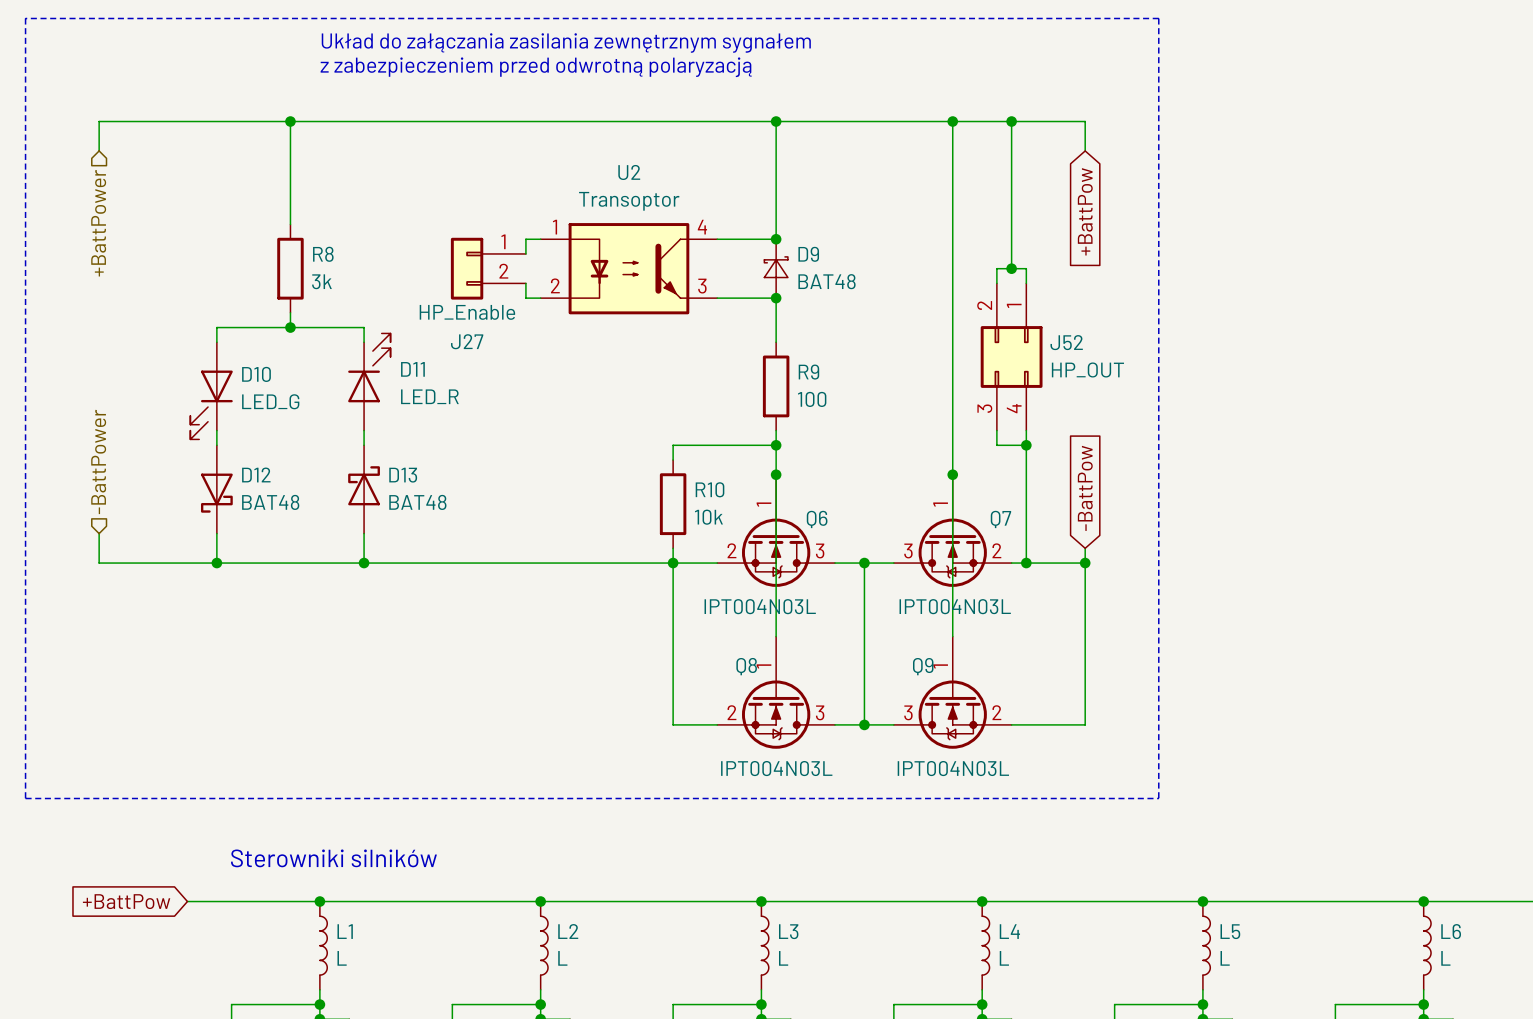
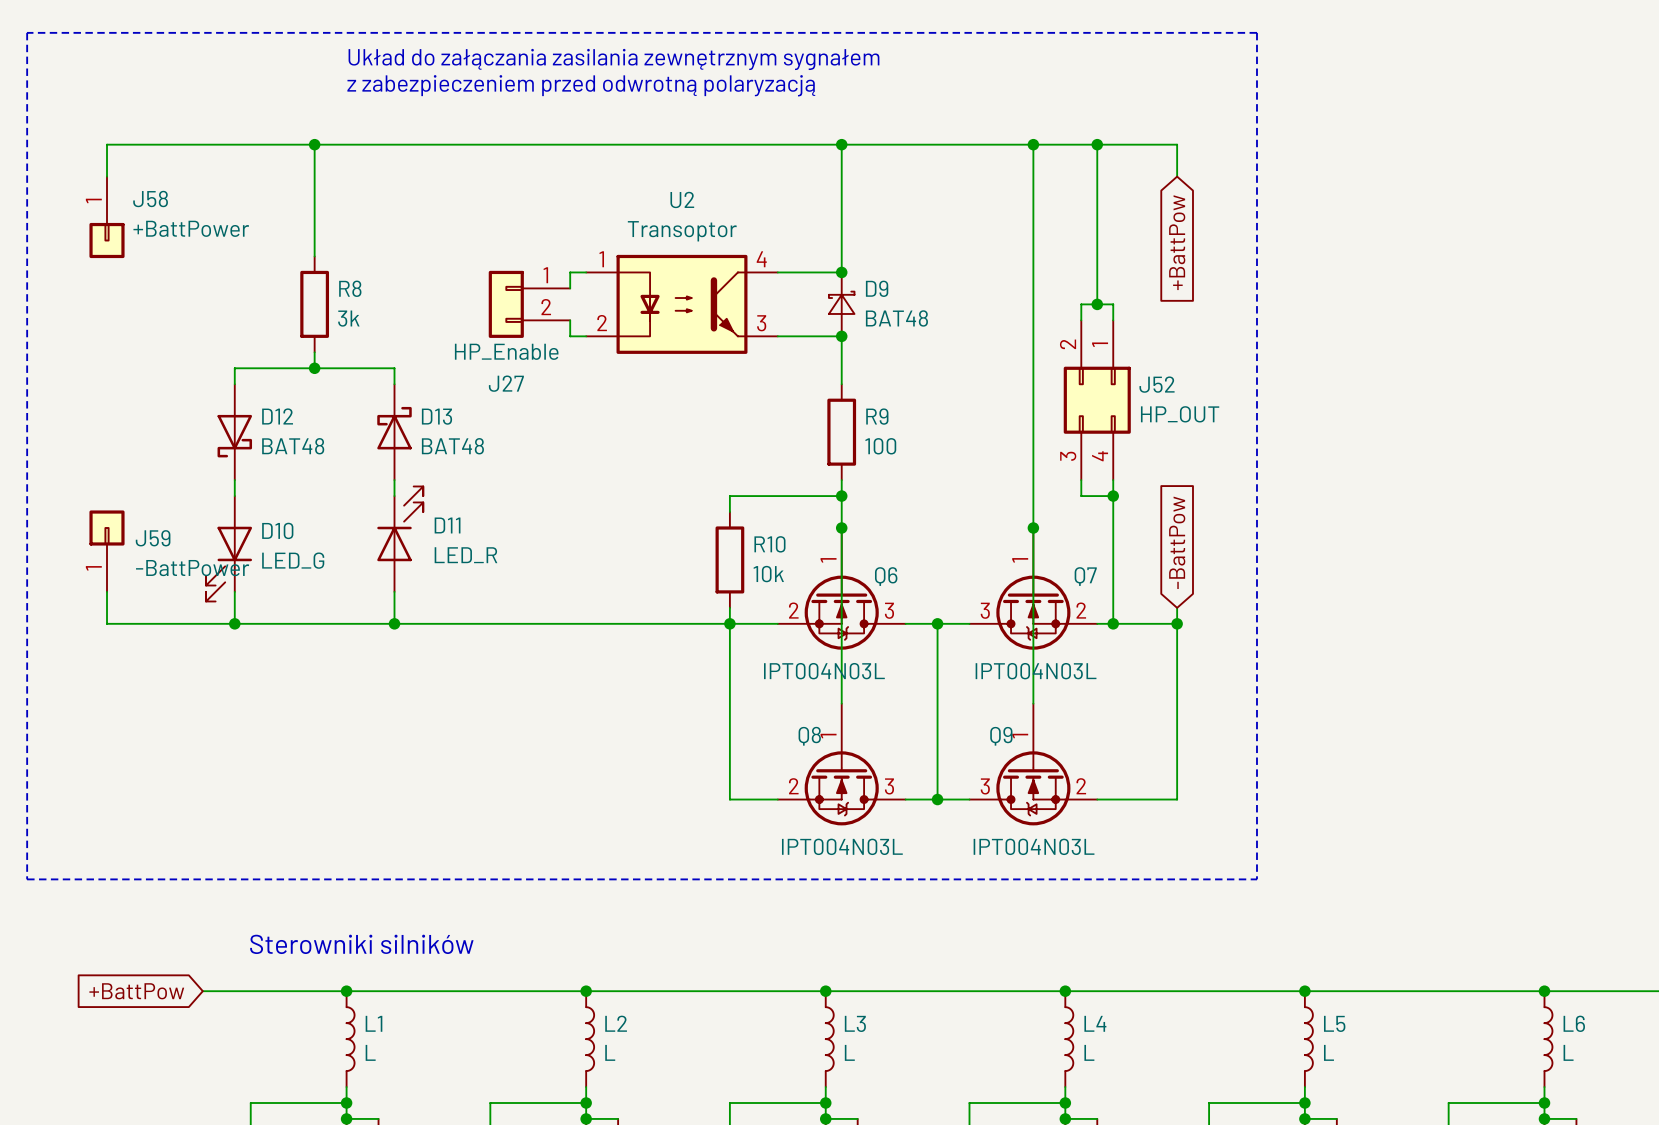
J58: none -> +BattPower (107, 217)
hierarchical label: +BattPower (98, 223) -> none
D11 position: (369, 382) -> (400, 539)
D10 position: (211, 390) -> (229, 548)
hierarchical label: -BattPower (98, 461) -> none
D12 position: (216, 489) -> (234, 432)
D13 position: (364, 489) -> (394, 432)
J59: none -> -BattPower (107, 551)

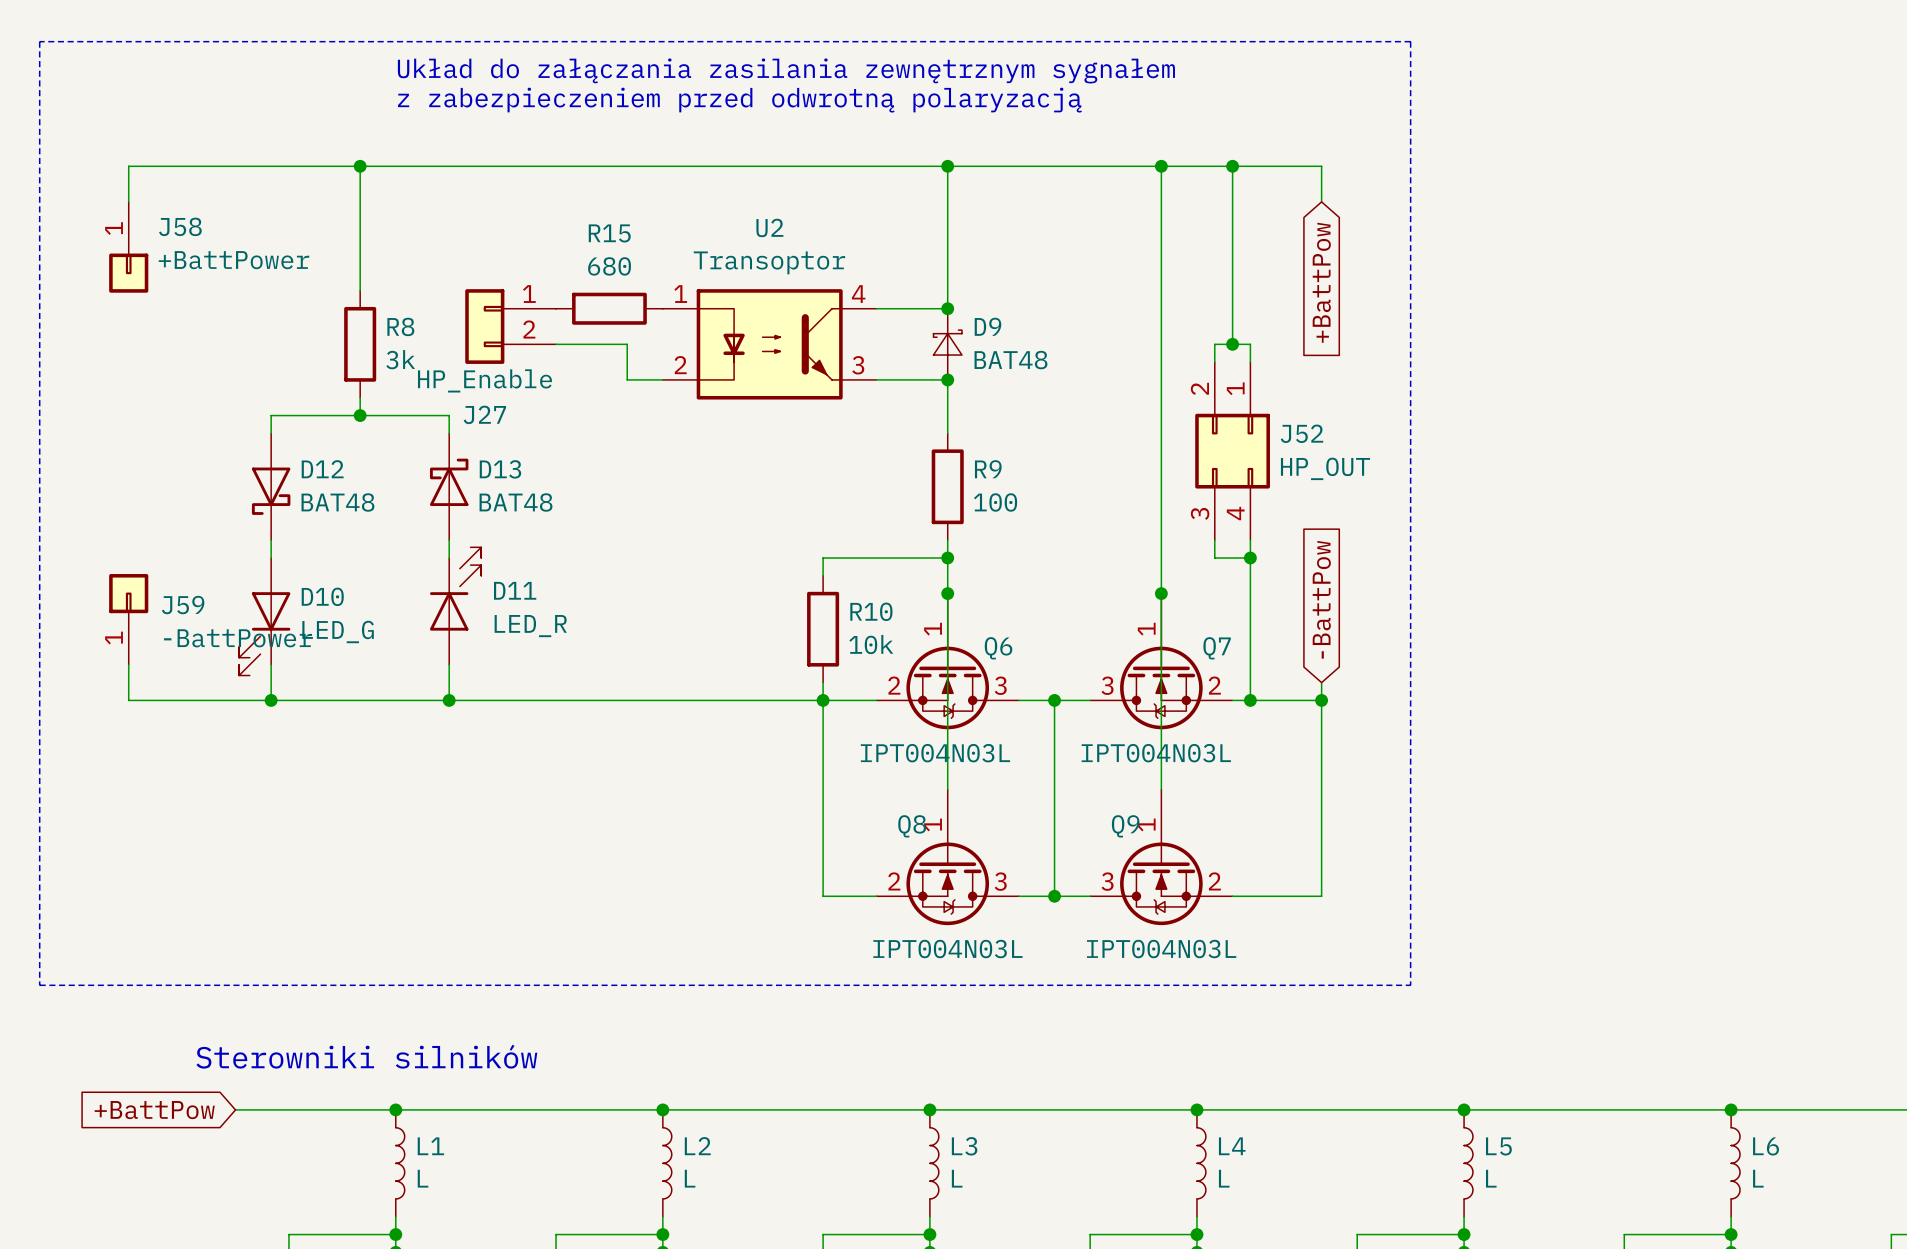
R15: none -> 680 (609, 308)
J27 position: (529, 304) -> (510, 326)
wire: (570, 320) (570, 336) -> (556, 344) (627, 344) (627, 379) (645, 379)

